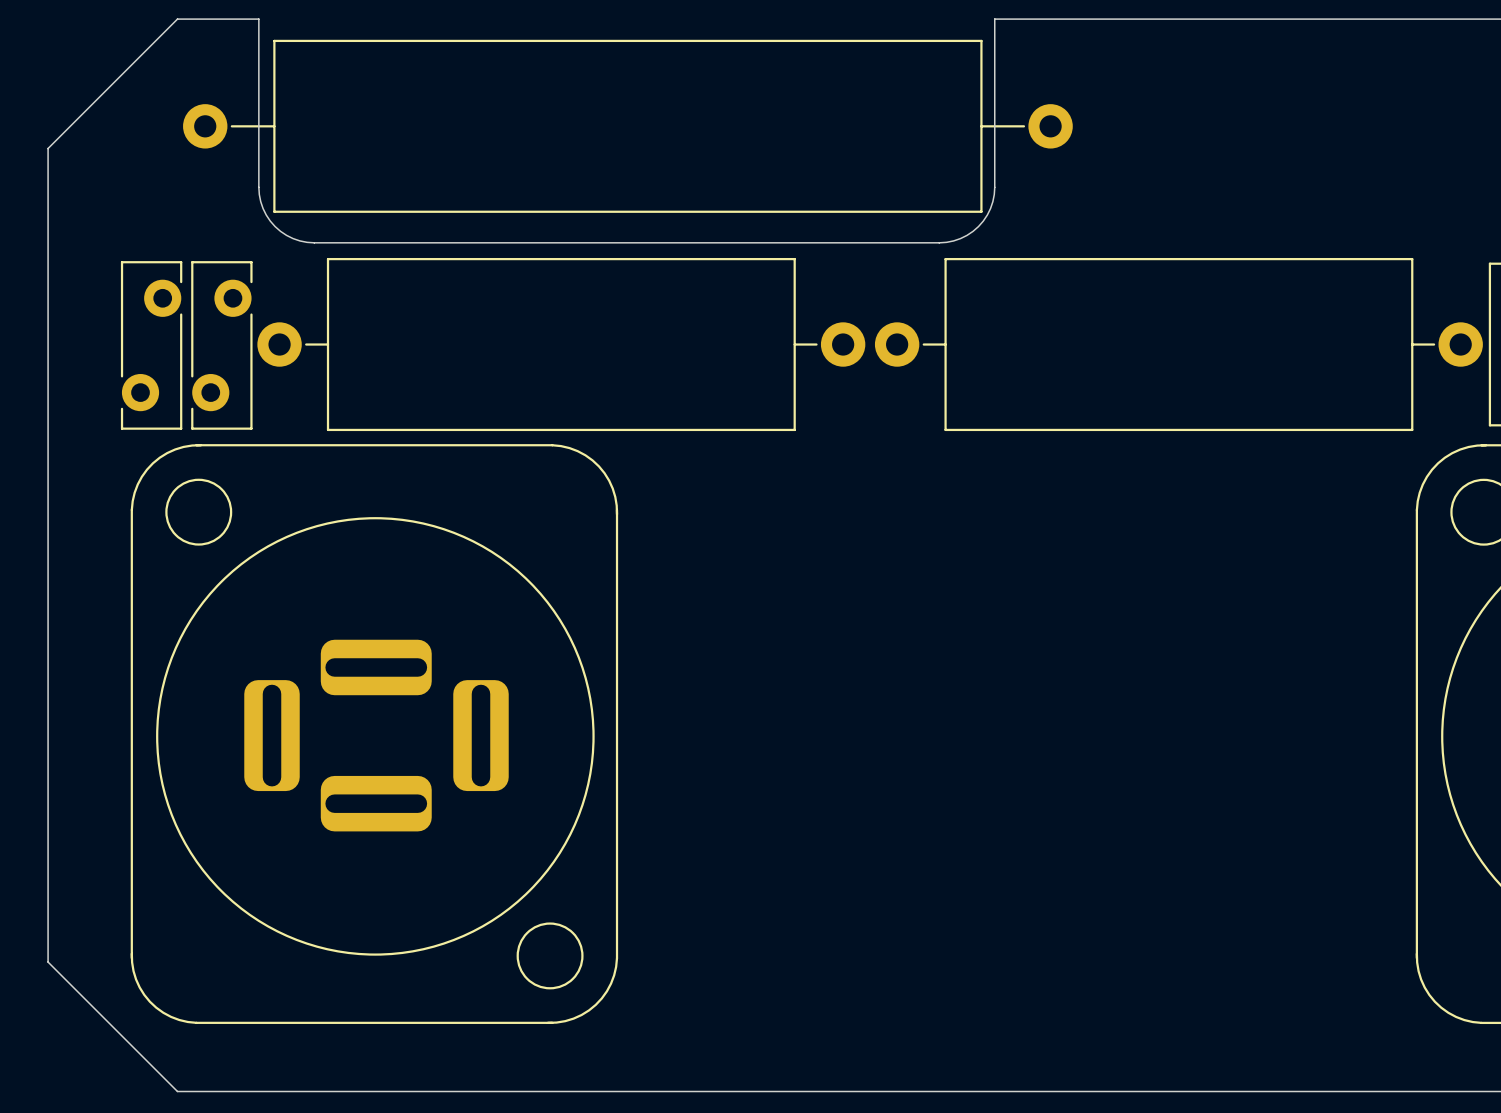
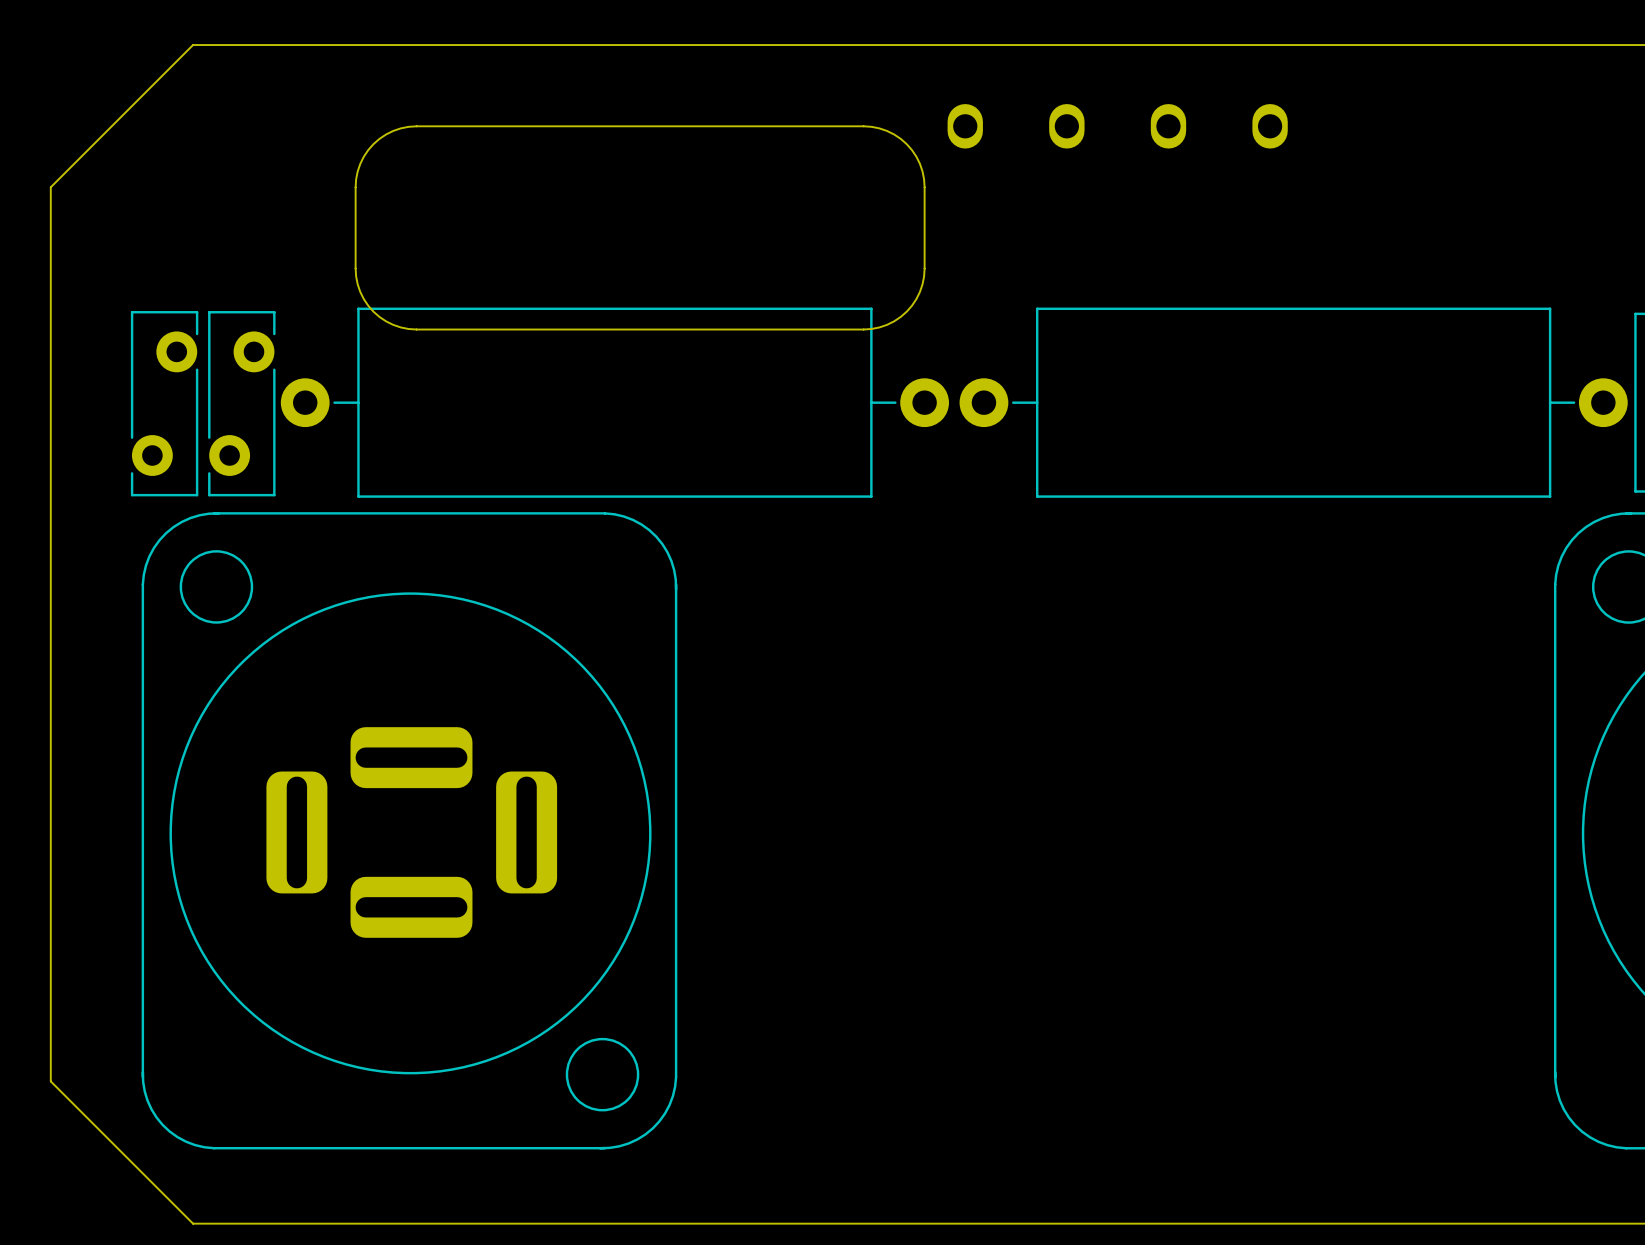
board edge: (258, 19) (258, 187) (260, 201) (270, 221) (280, 231) (299, 240) (314, 242) (939, 242) (953, 240) (967, 235) (978, 226) (990, 208) (994, 194) (994, 19) -> (282, 45) (1091, 45)
board edge: none -> (416, 126) (863, 126) (879, 128) (894, 134) (906, 144) (916, 156) (922, 171) (924, 187) (924, 268) (922, 284) (916, 299) (906, 311) (894, 321) (871, 329) (416, 329) (400, 327) (386, 321) (373, 311) (363, 299) (357, 284) (355, 268) (356, 179) (363, 156) (373, 144) (393, 130) (416, 126)
part: none -> (965, 126)
part: none -> (1066, 126)
part: none -> (1168, 126)
part: none -> (1270, 126)
part: (627, 126) -> none

